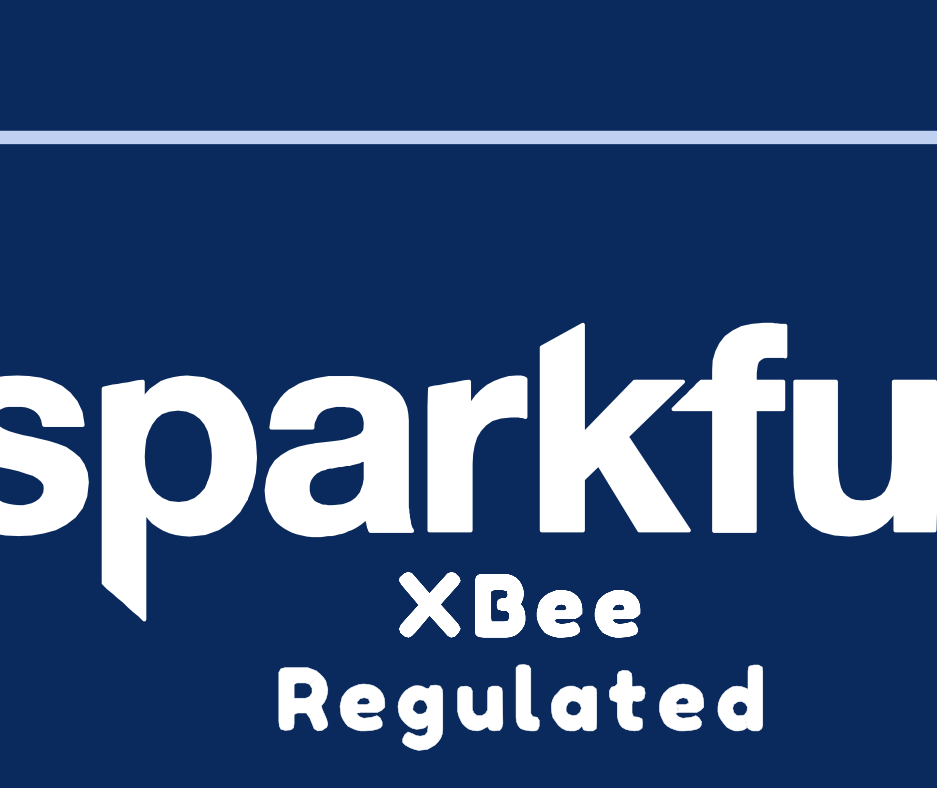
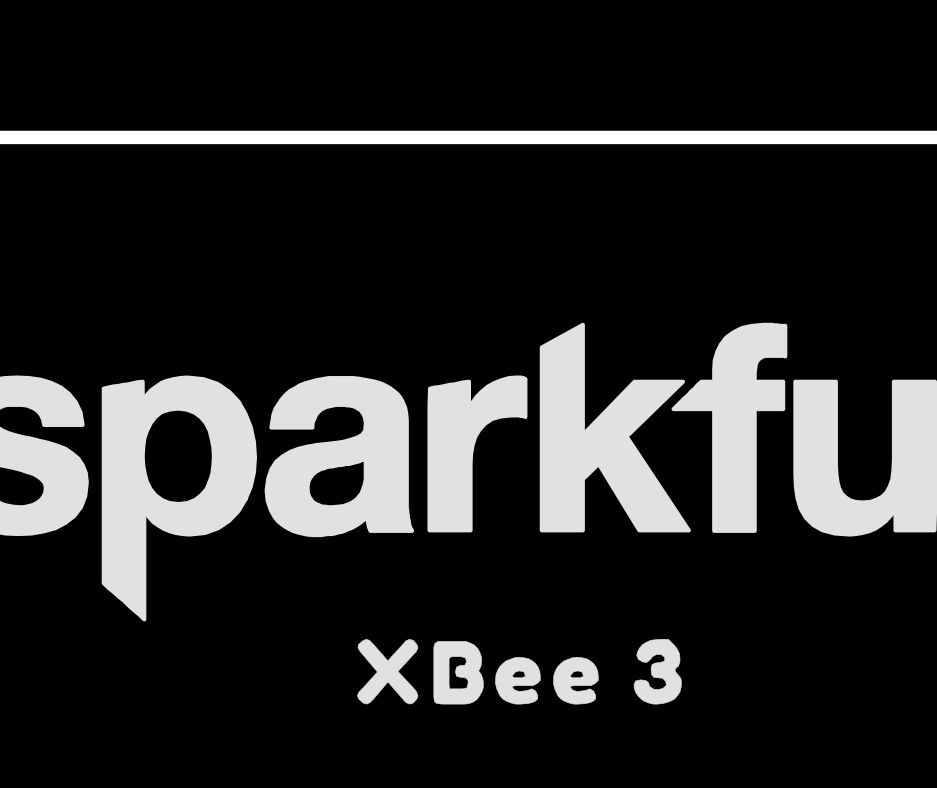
drawing: [399, 572, 641, 638] -> none
drawing shape: [278, 664, 764, 751] -> [357, 639, 682, 705]

